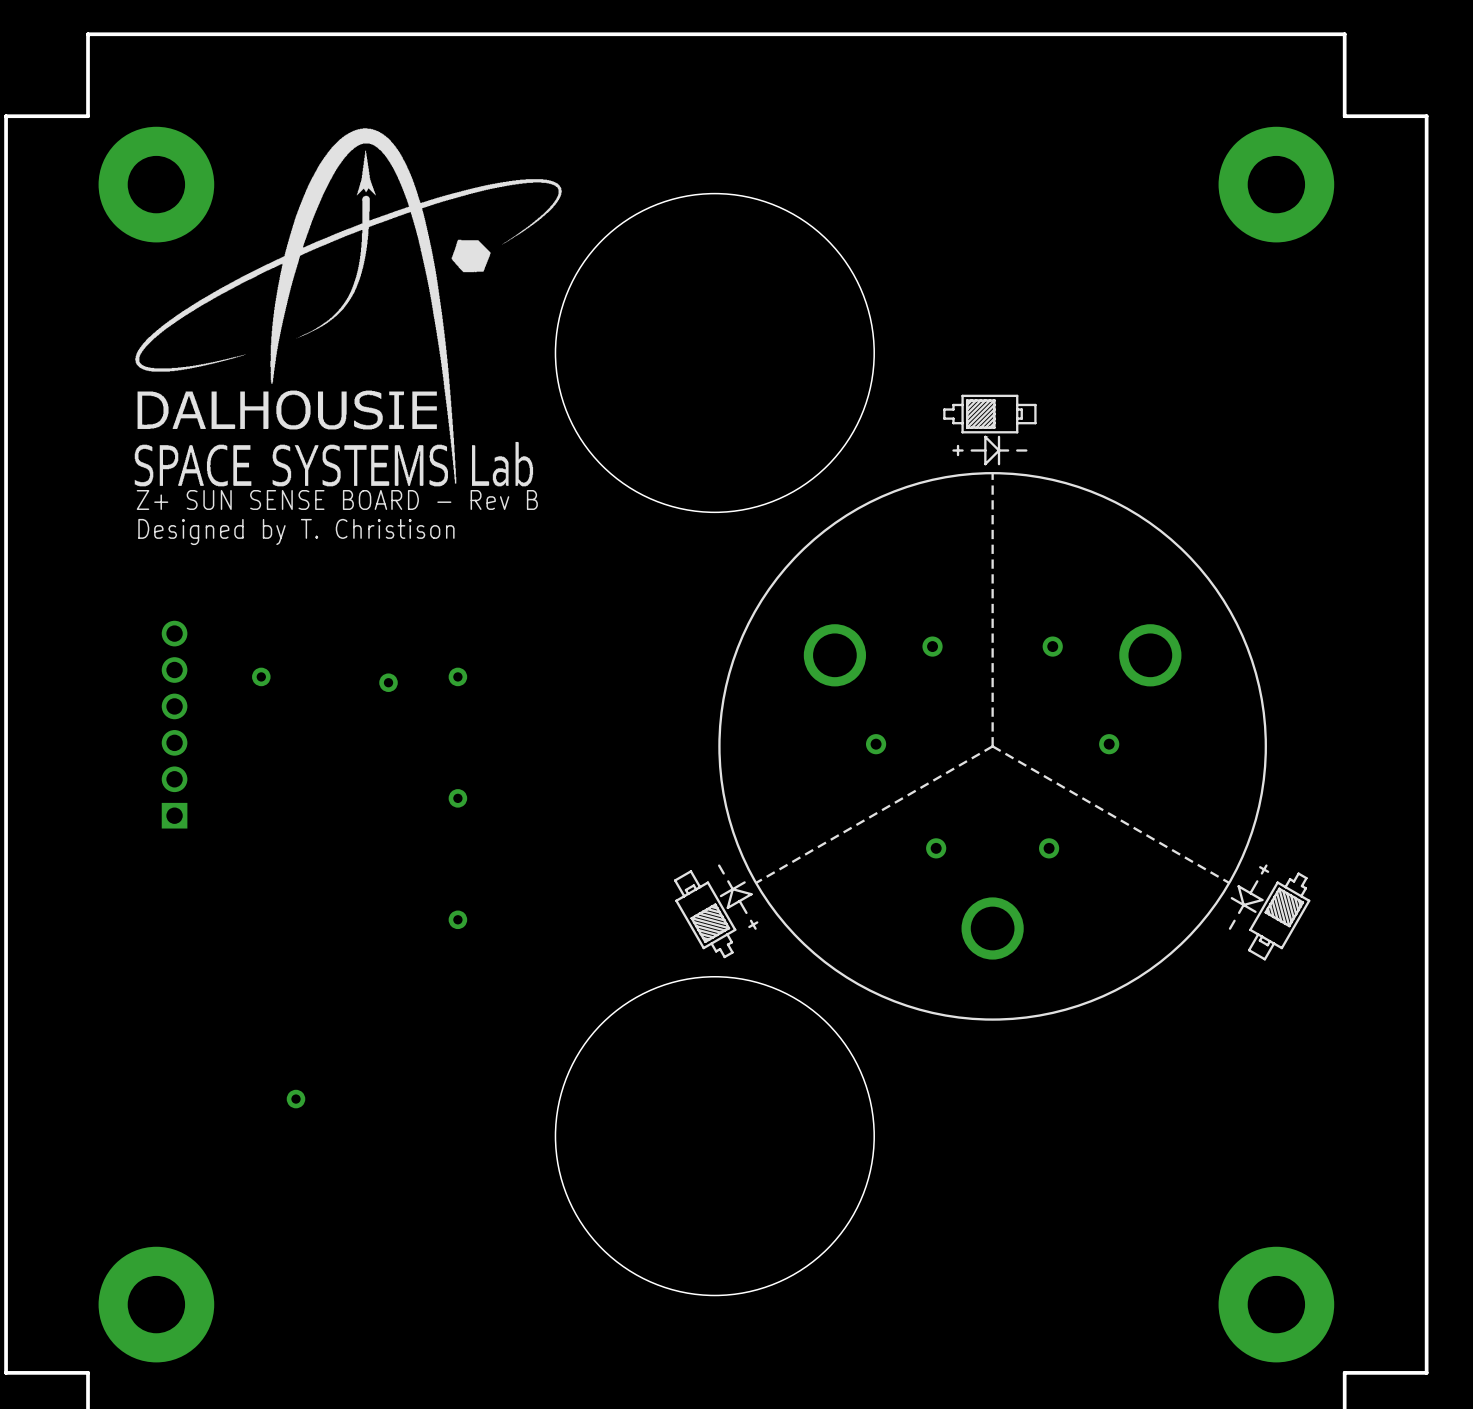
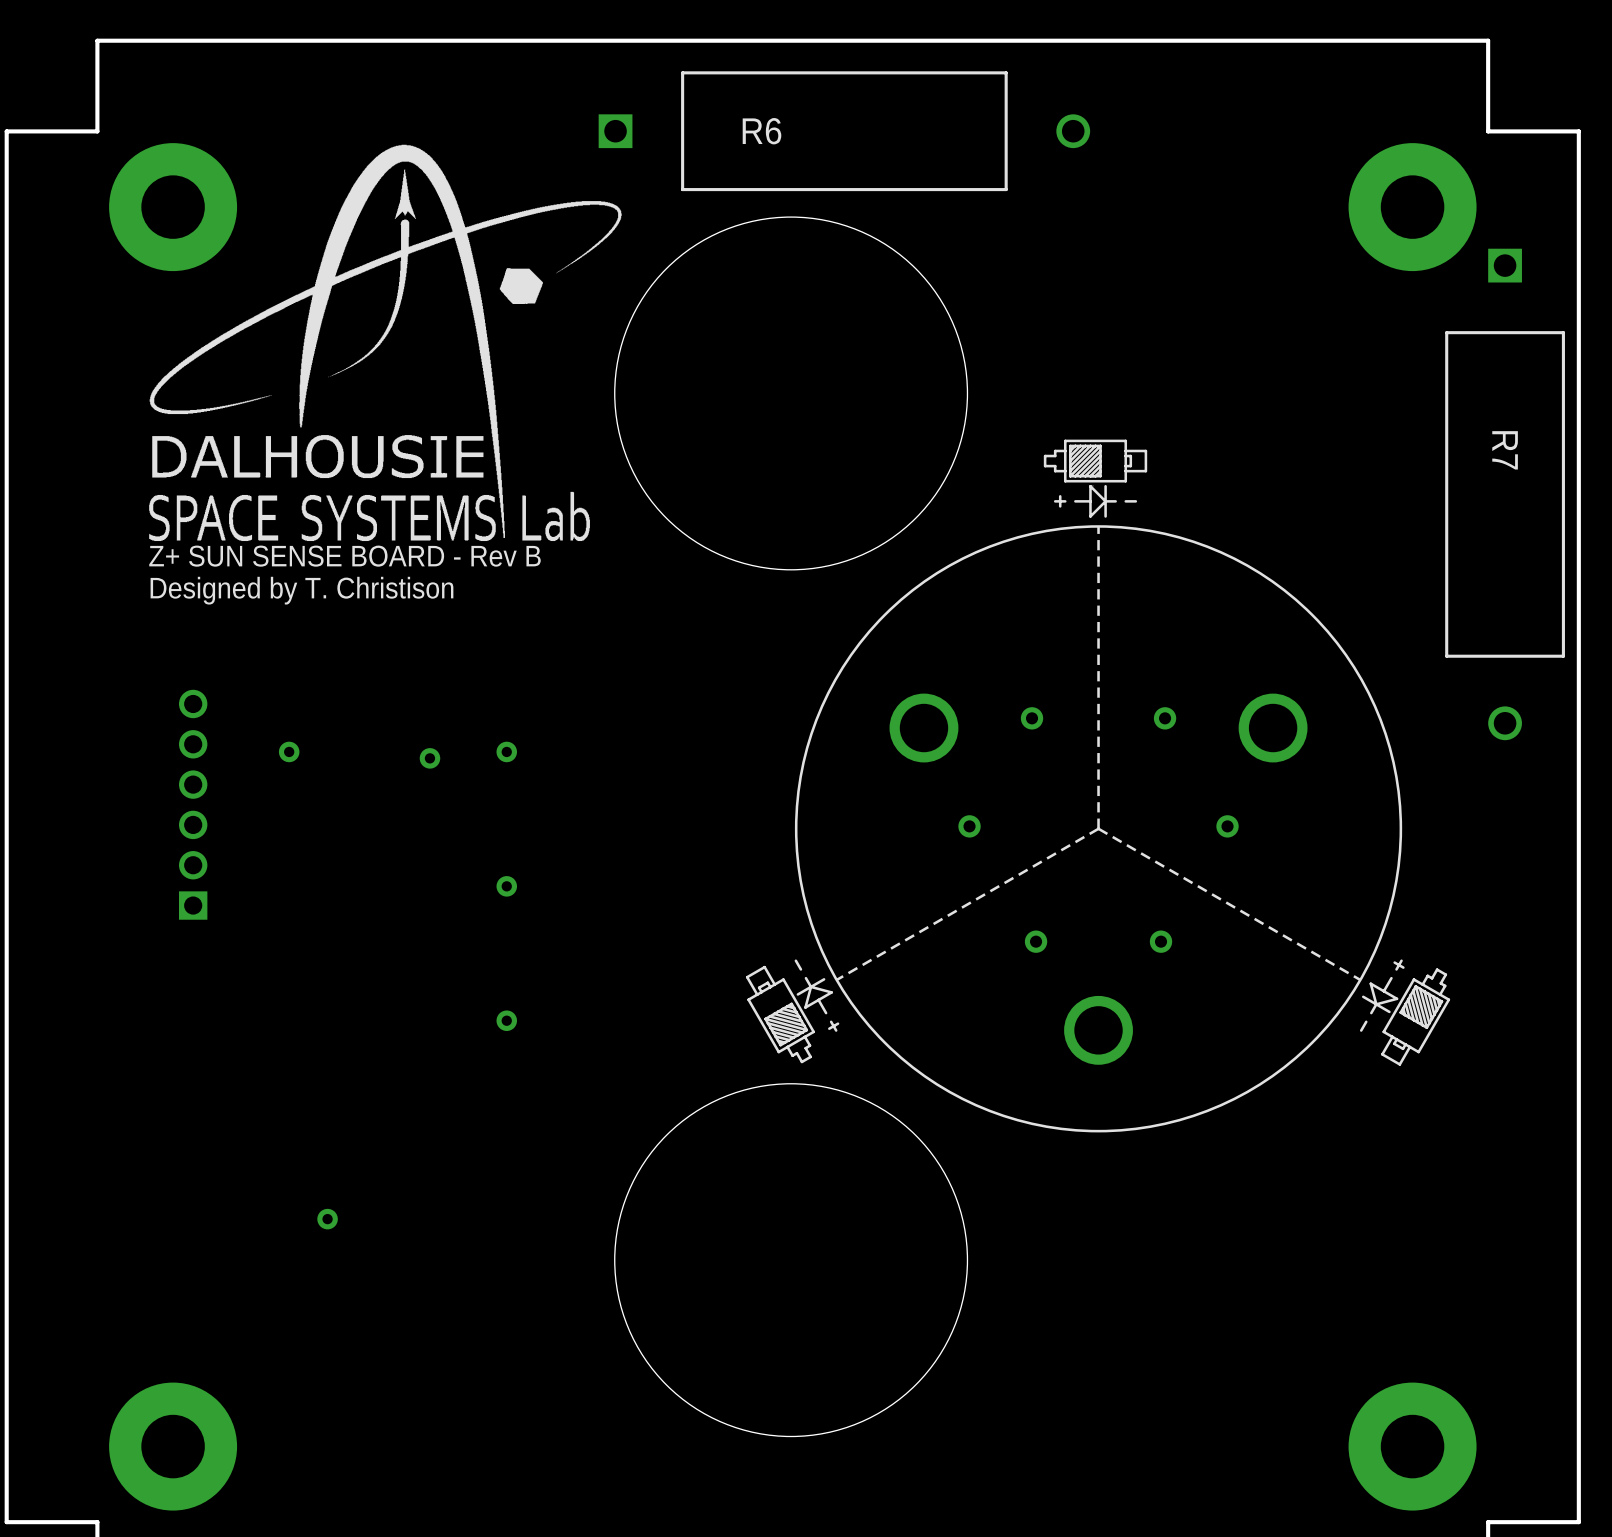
R6: none -> (844, 131)
R7: none -> (1505, 494)

